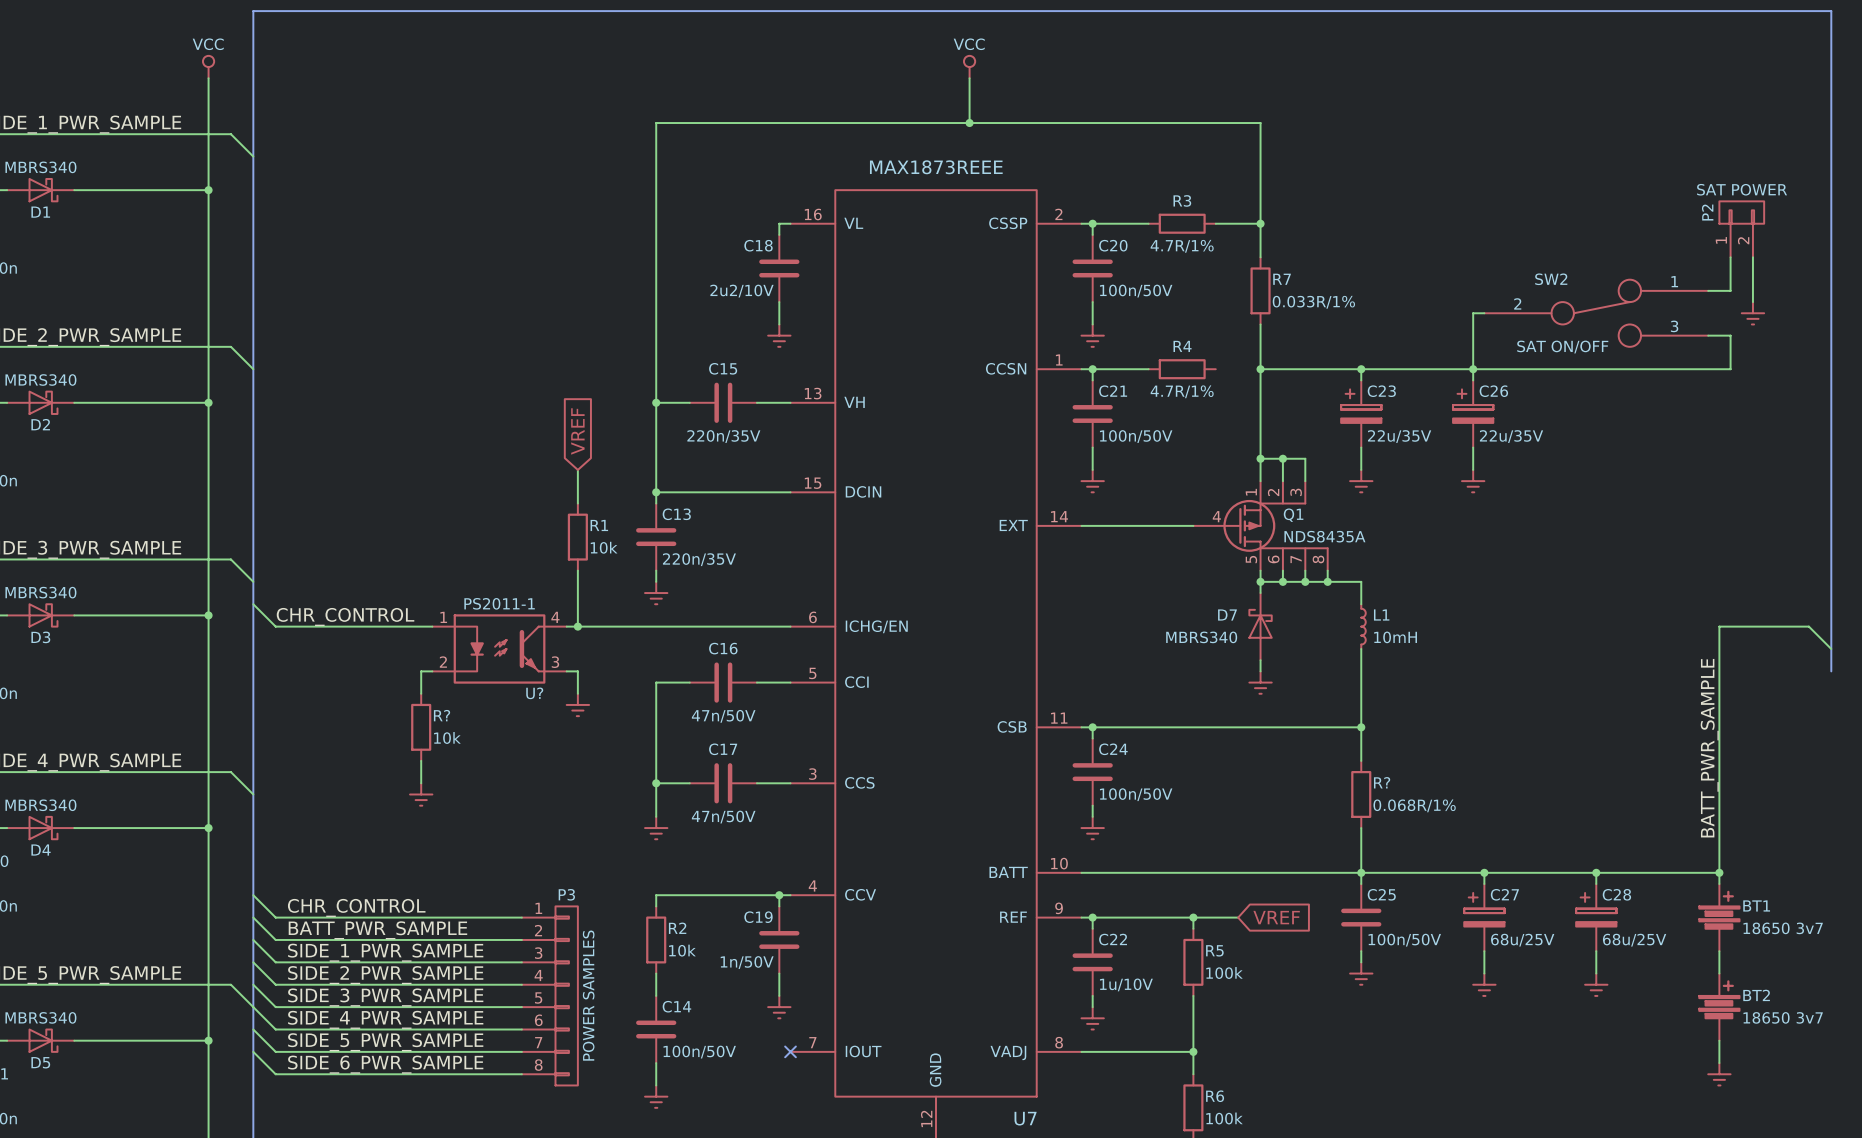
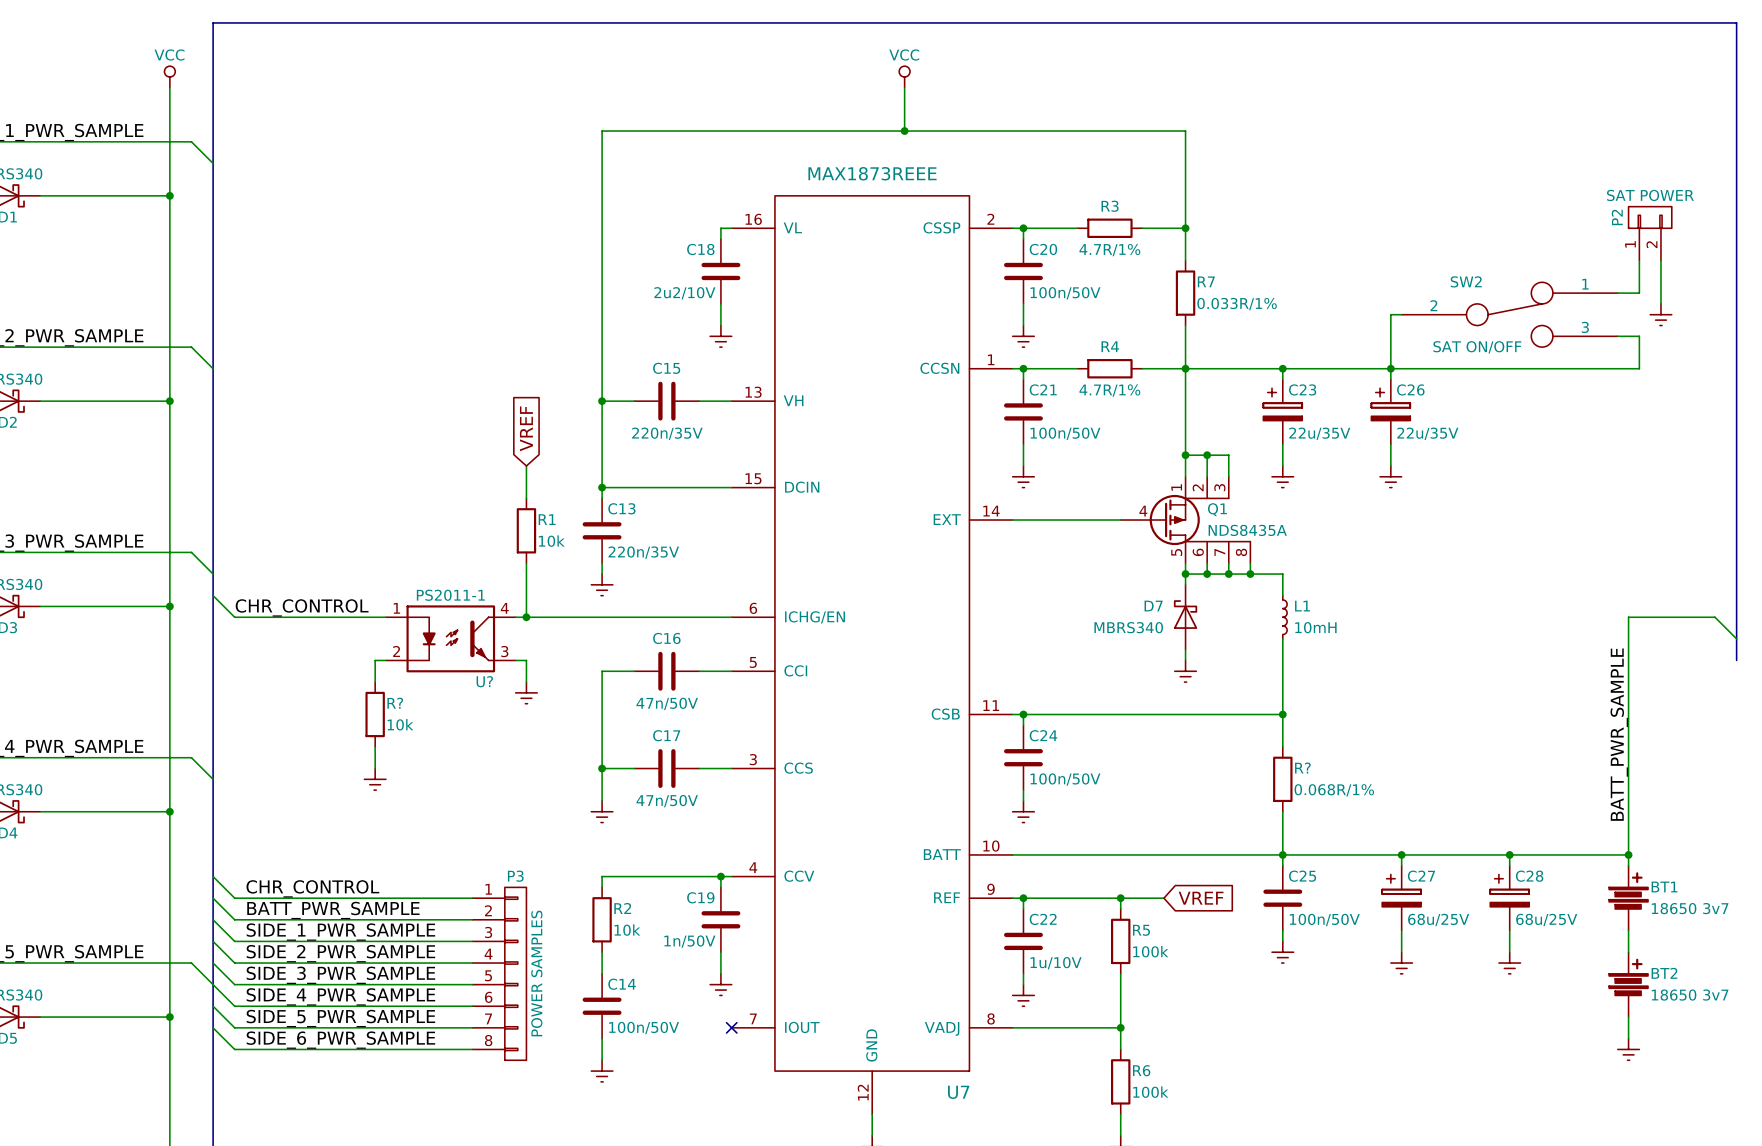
wire: none -> (1142, 368) (1185, 368)

